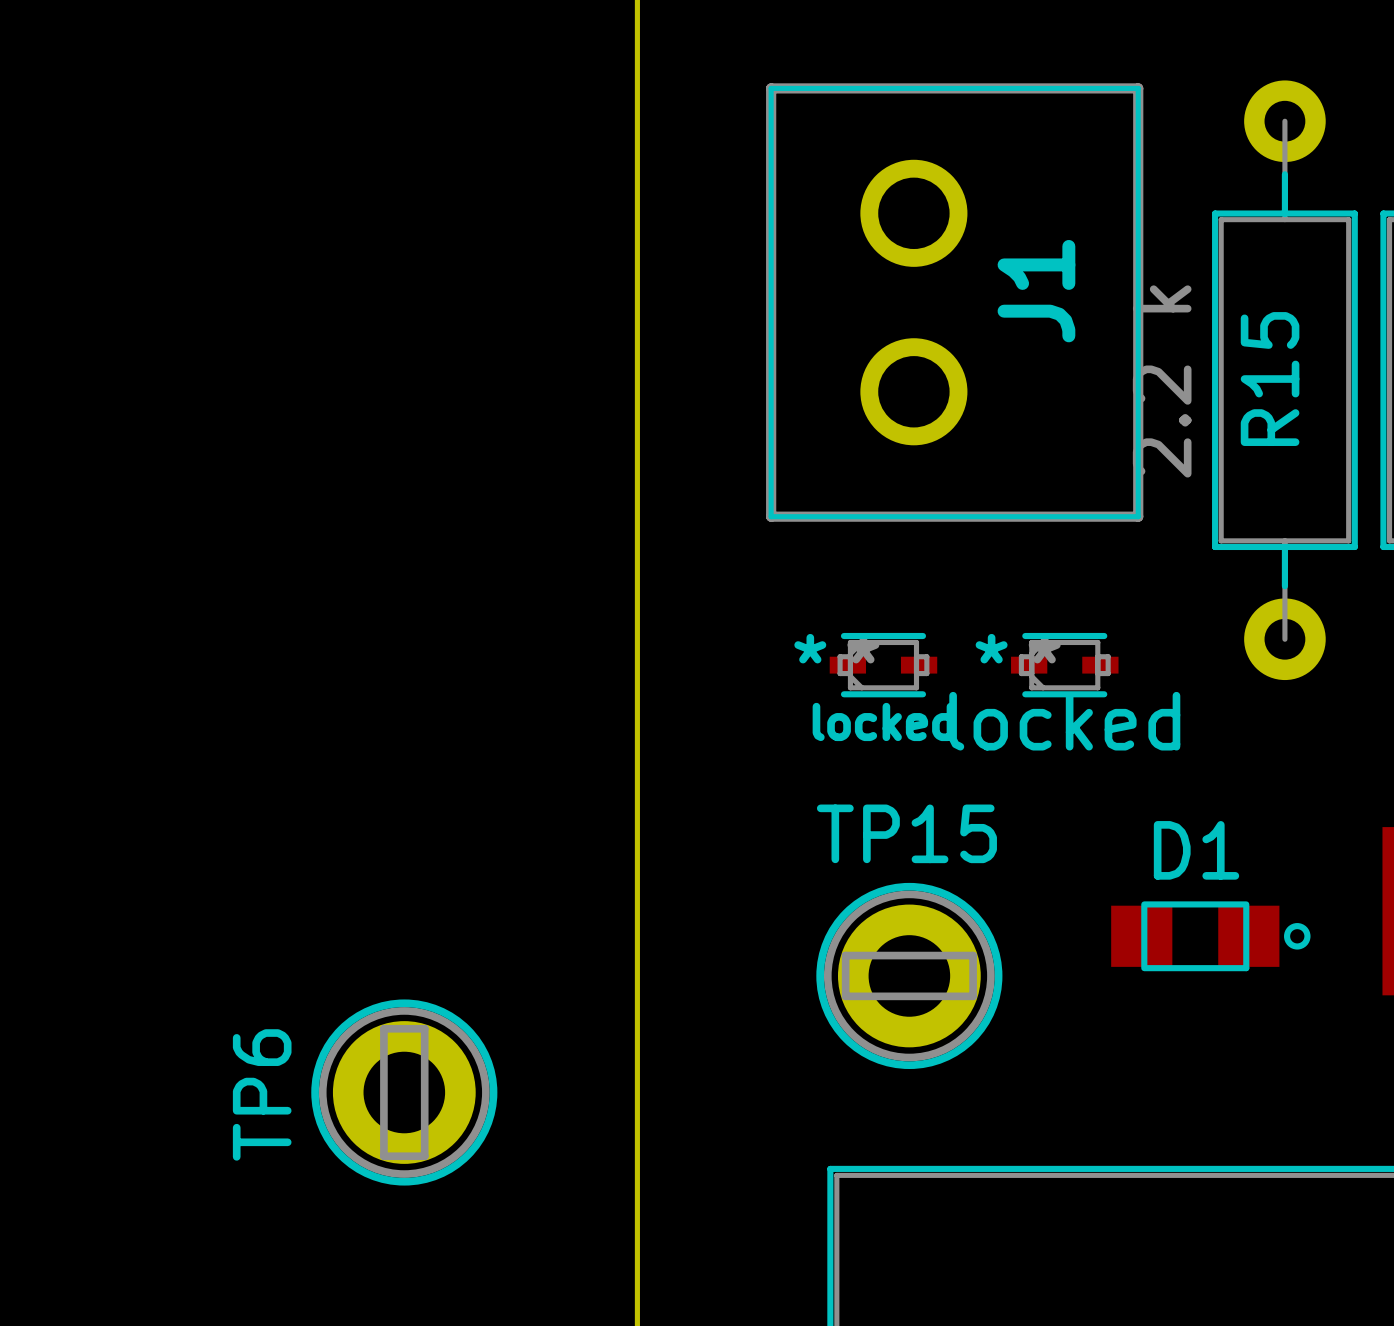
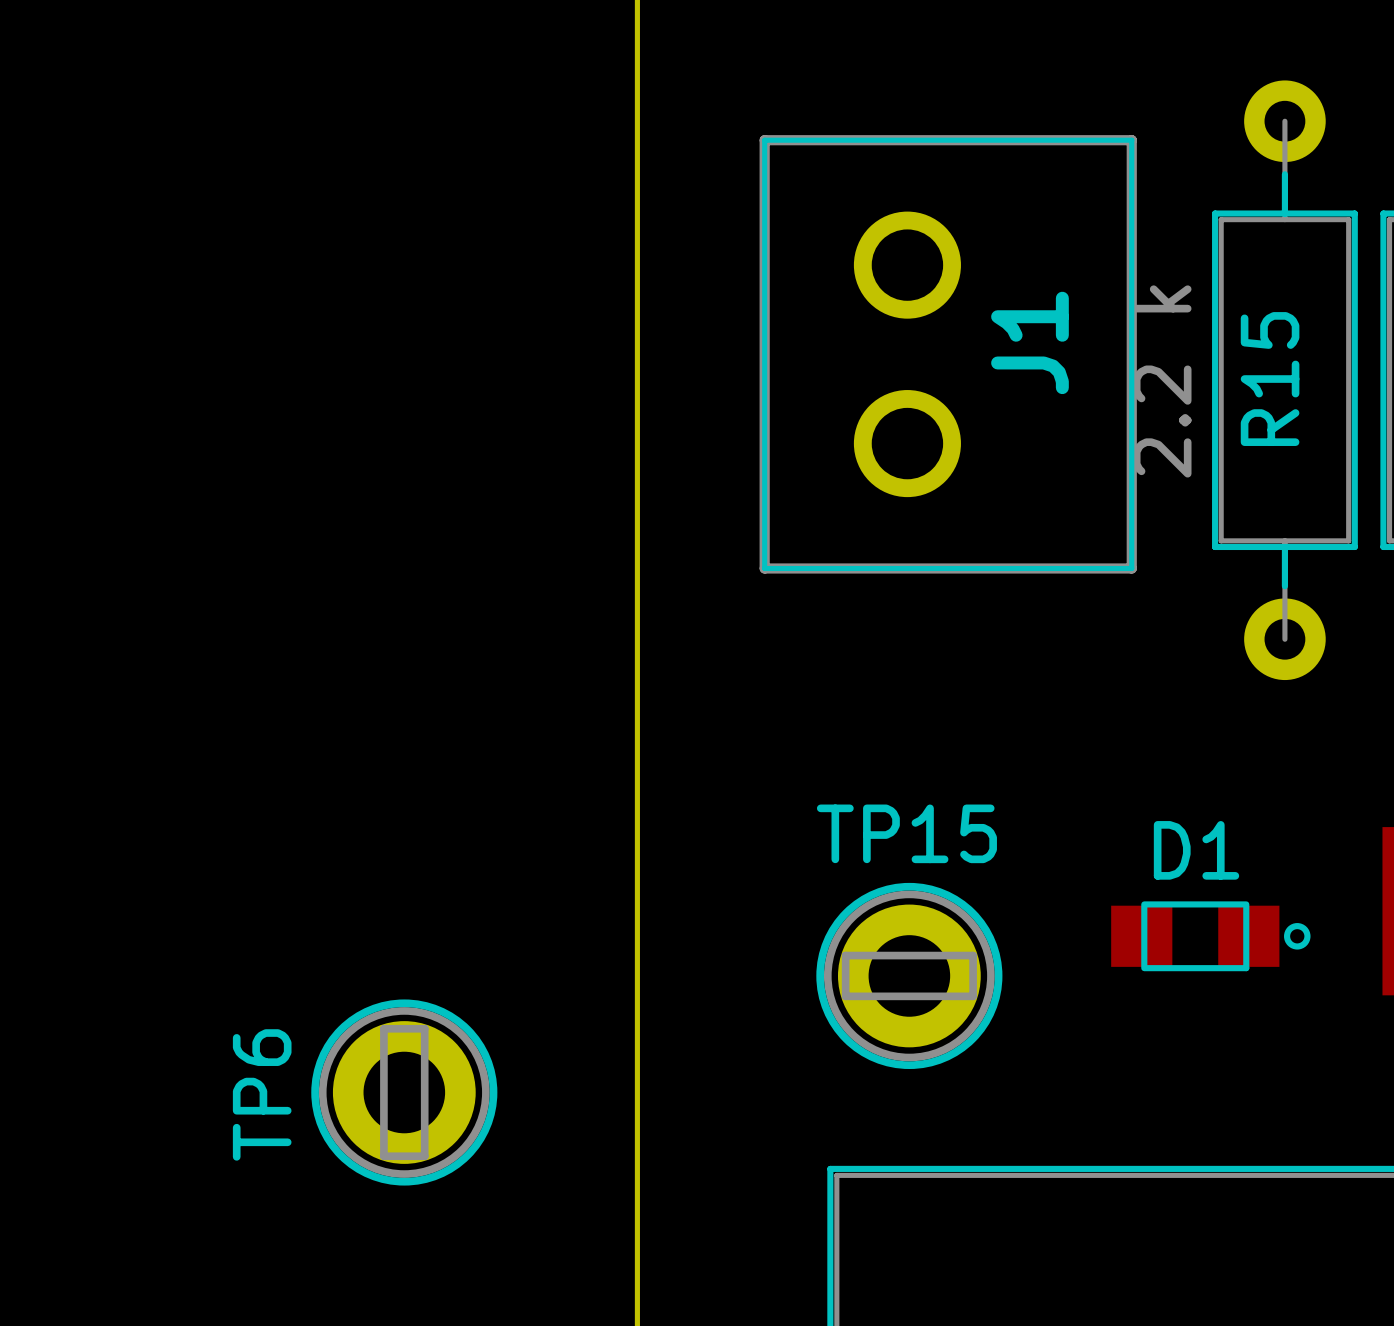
J1 position: (954, 302) -> (948, 354)
locked: (883, 665) -> none
locked: (1064, 665) -> none

